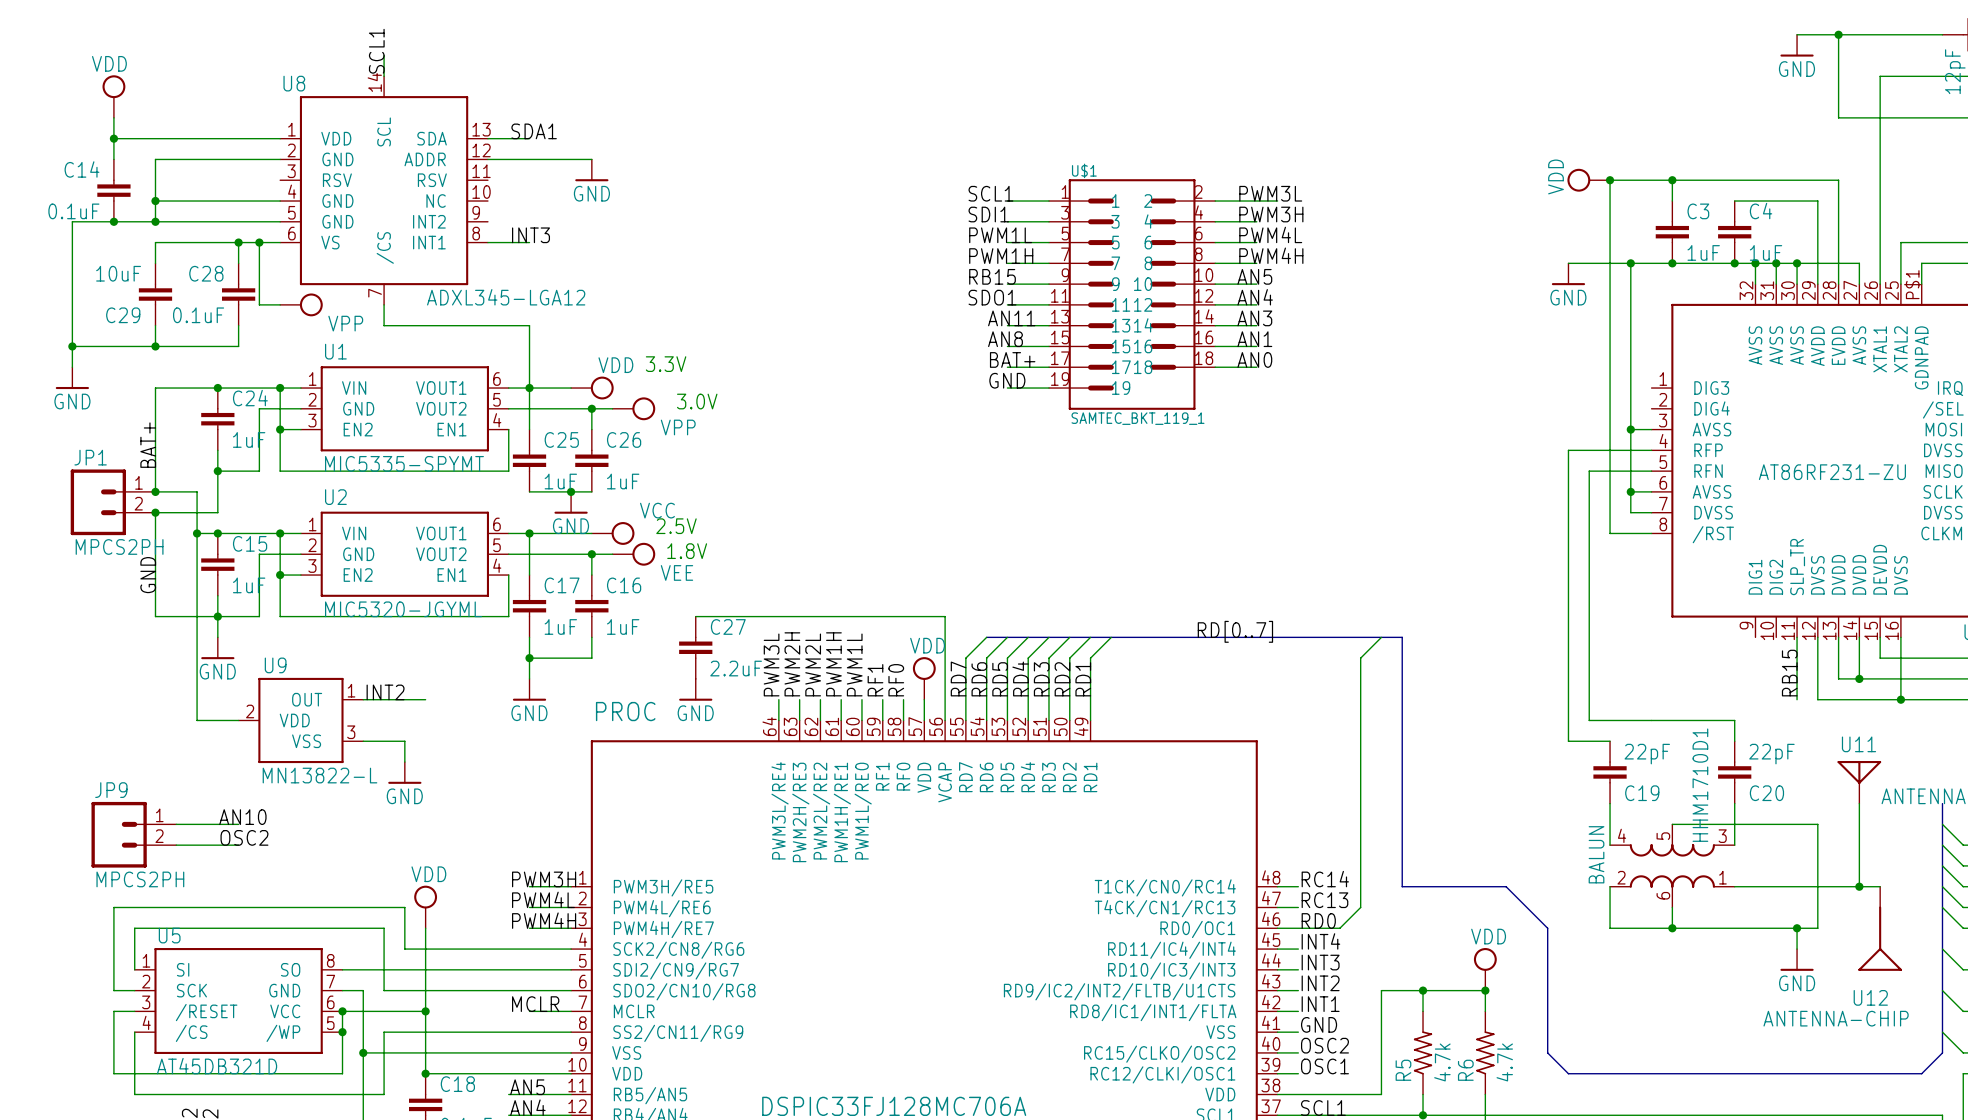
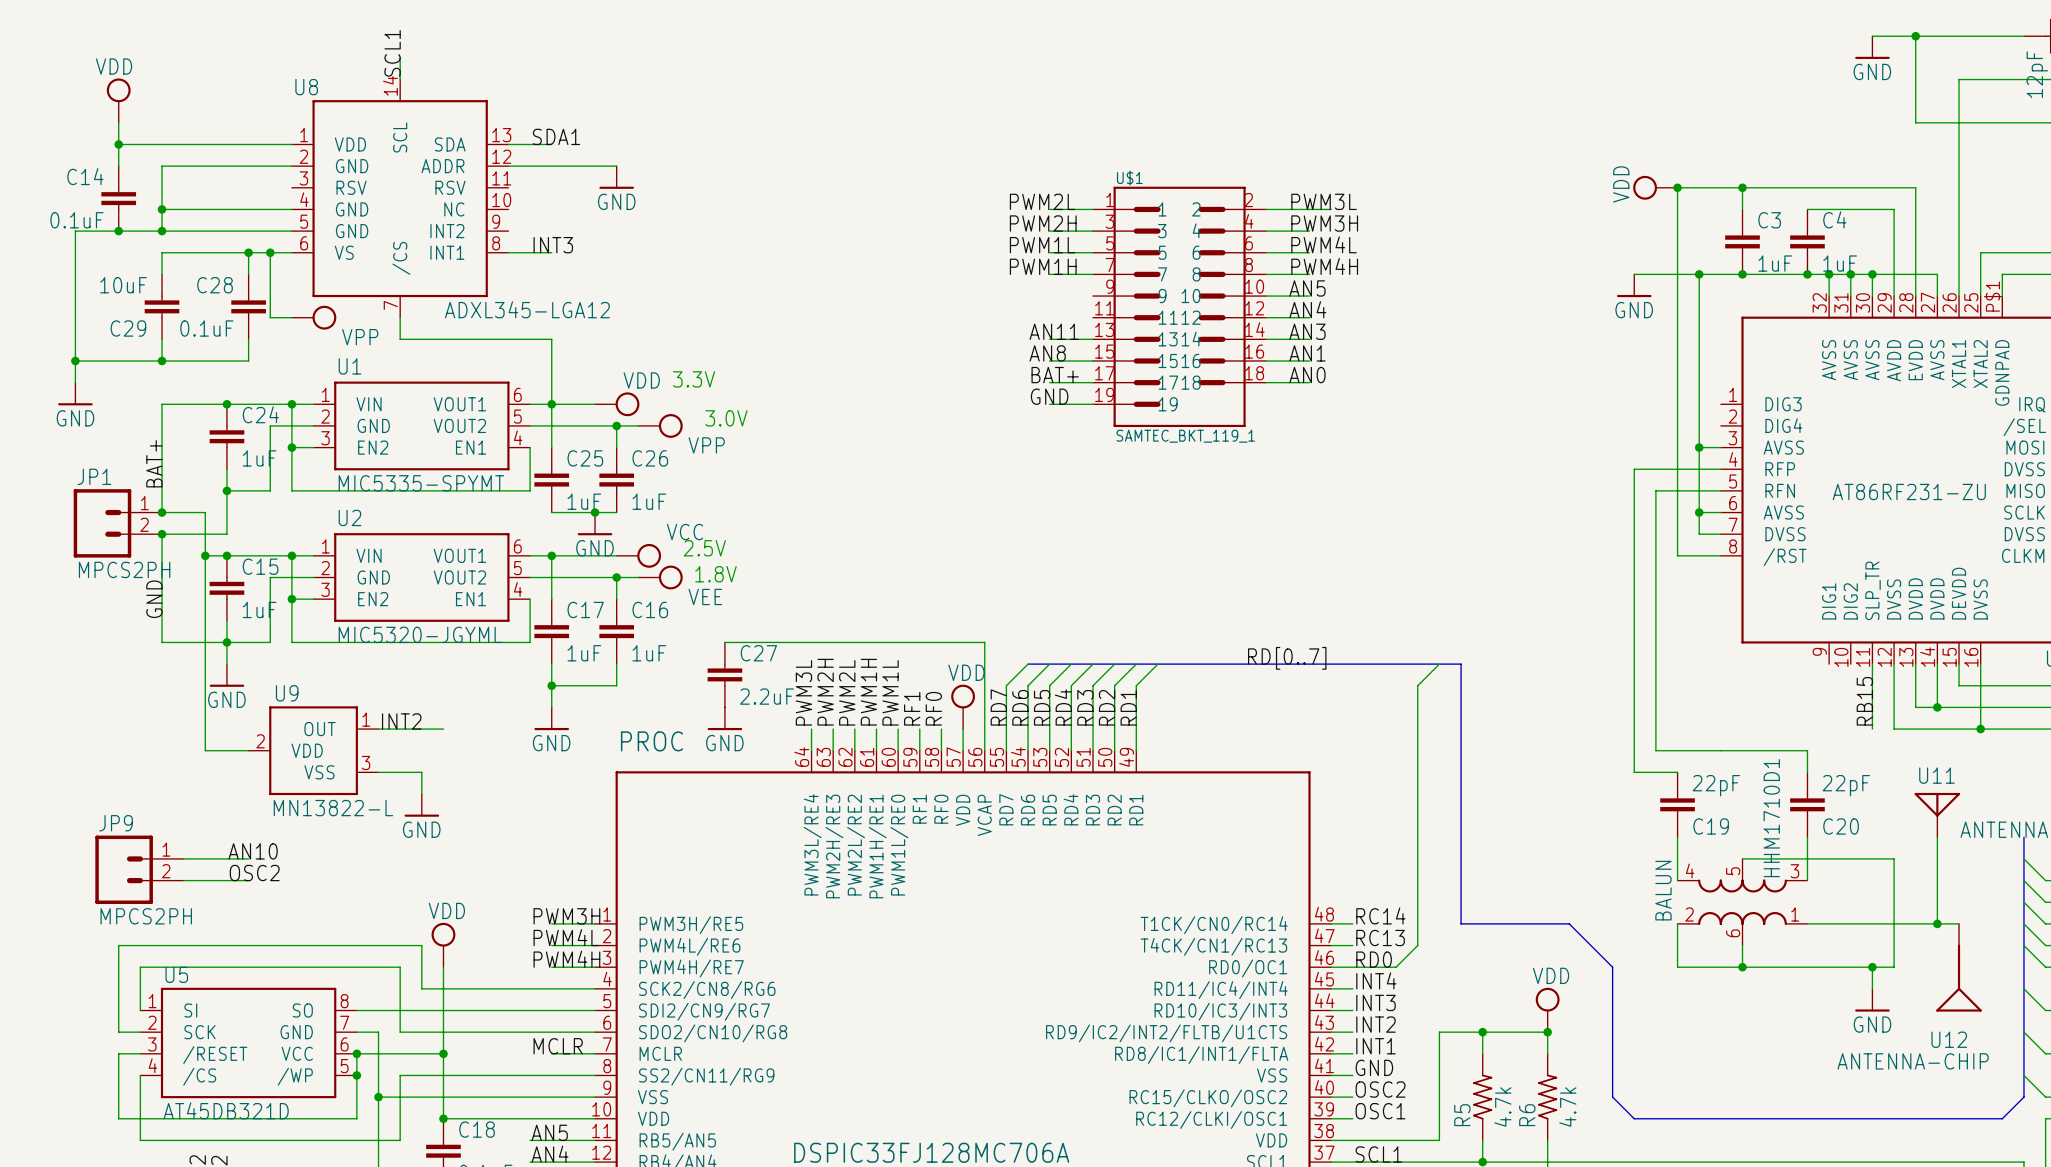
label: SCL1 (990, 193) -> PWM2L (1042, 201)
label: SDI1 (988, 214) -> PWM2H (1043, 223)
label: RB15 (992, 276) -> none
wire: (1007, 284) (1048, 284) -> none
label: SDO1 (992, 297) -> none
wire: (1007, 304) (1048, 304) -> none

